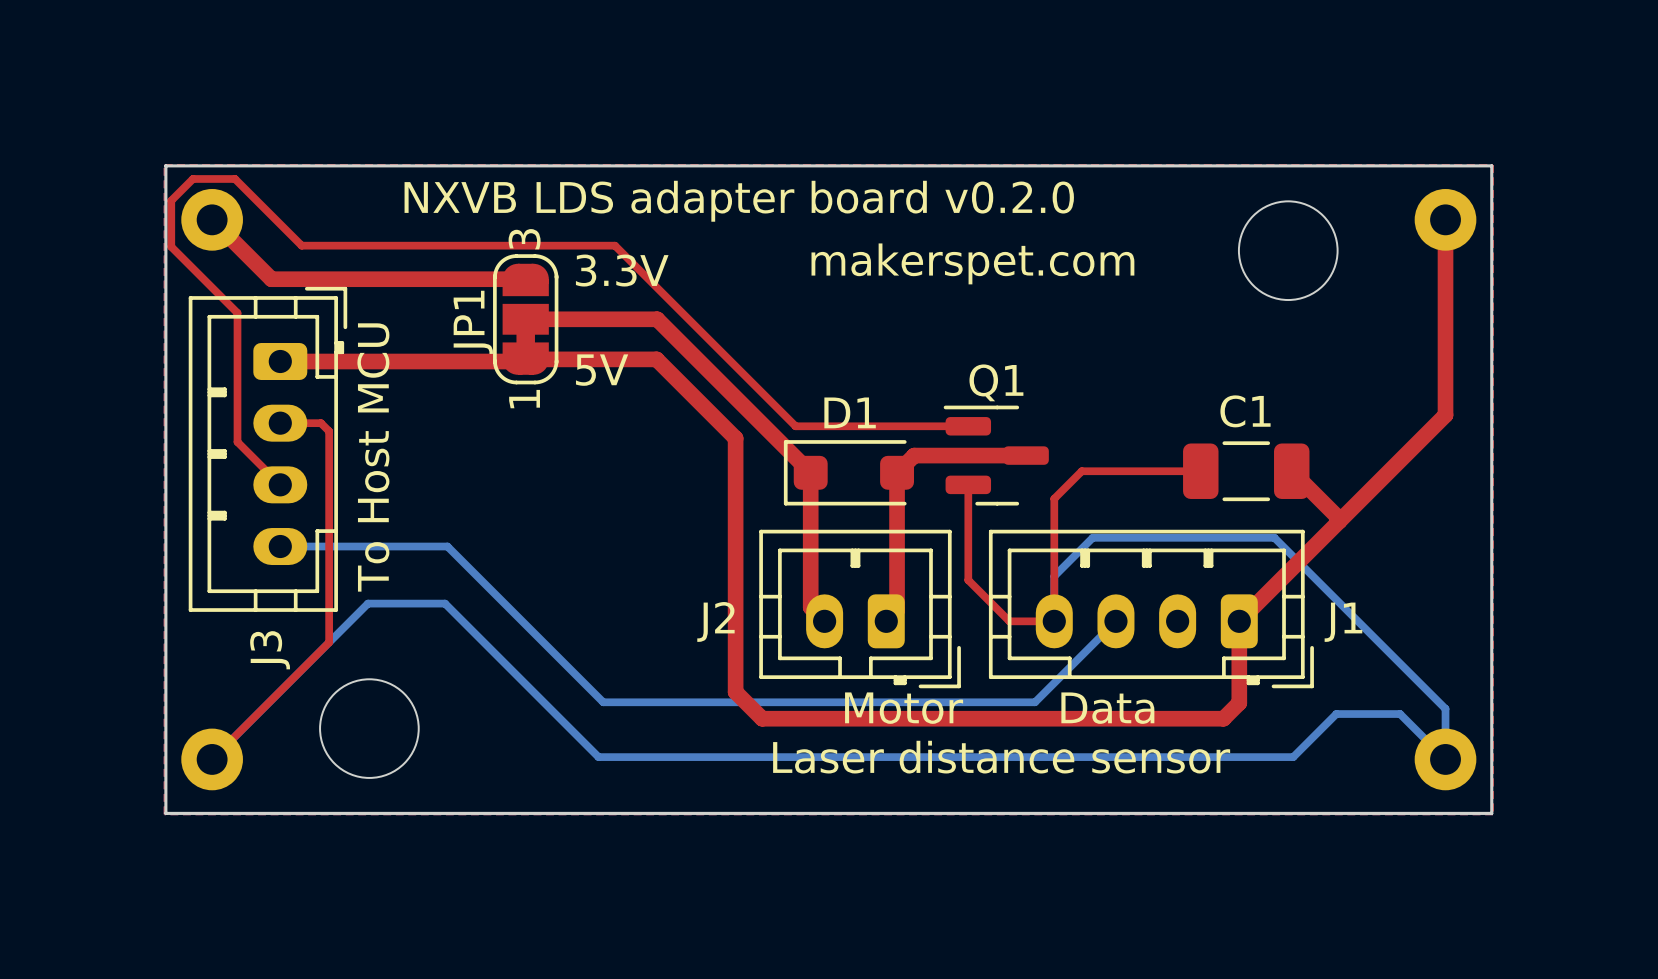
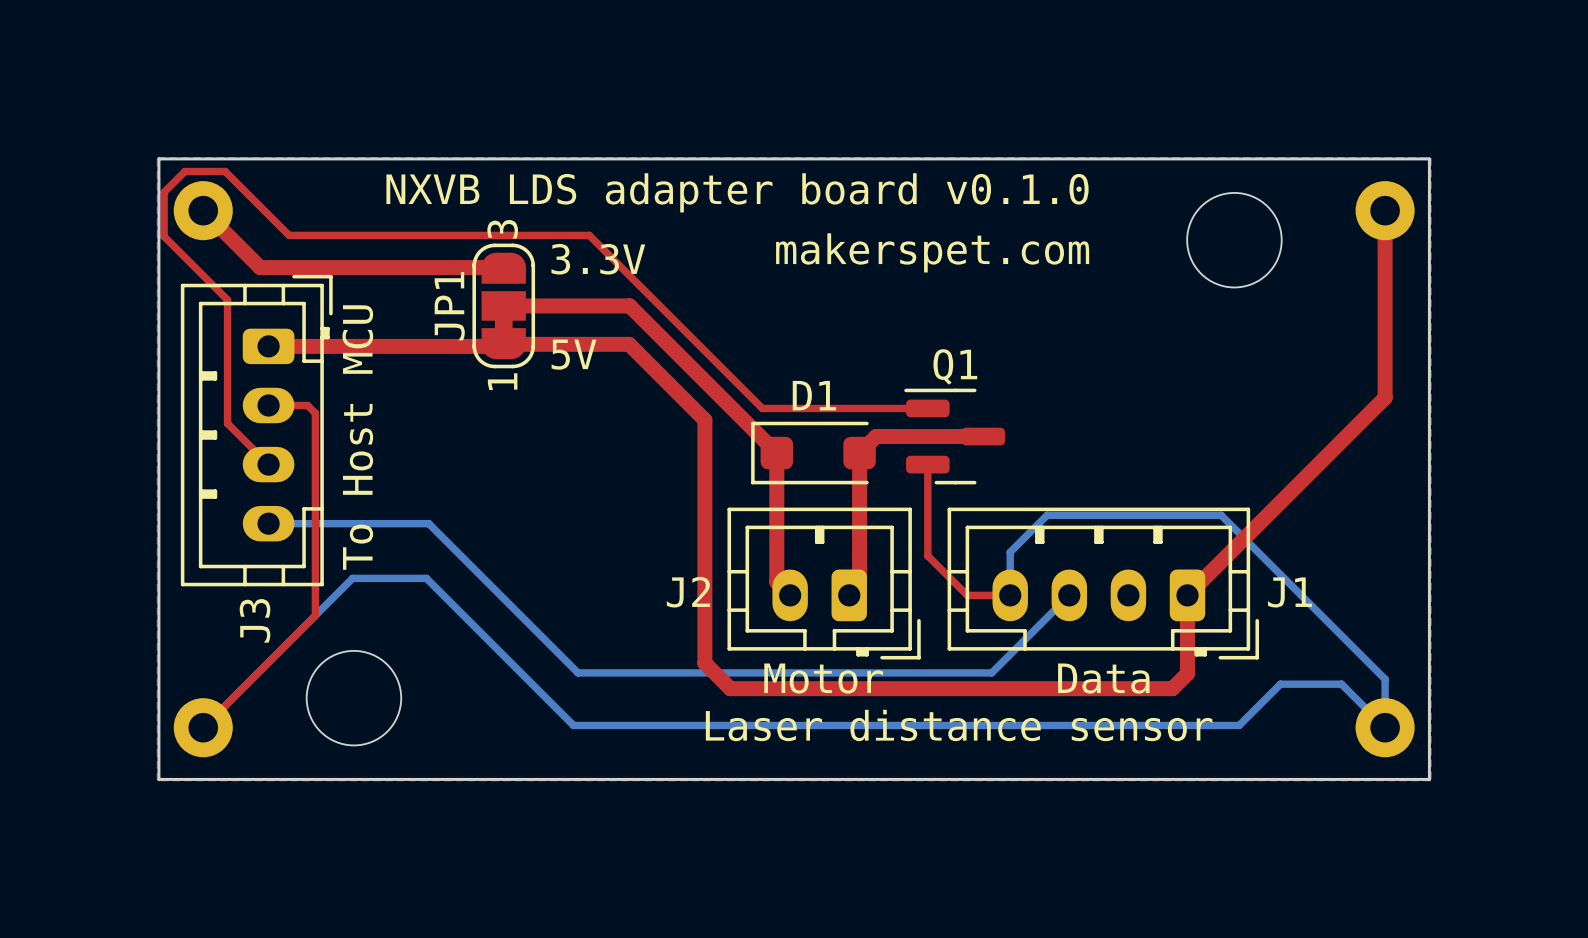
text: NXVB LDS adapter board v0.2.0 (739, 201) -> NXVB LDS adapter board v0.1.0 (737, 192)
top track: (1200, 471) (1081, 471) (1054, 498) (1054, 621) -> none
C1: (1246, 471) -> none
top track: (1291, 471) (1339, 518) (1339, 521) -> none

